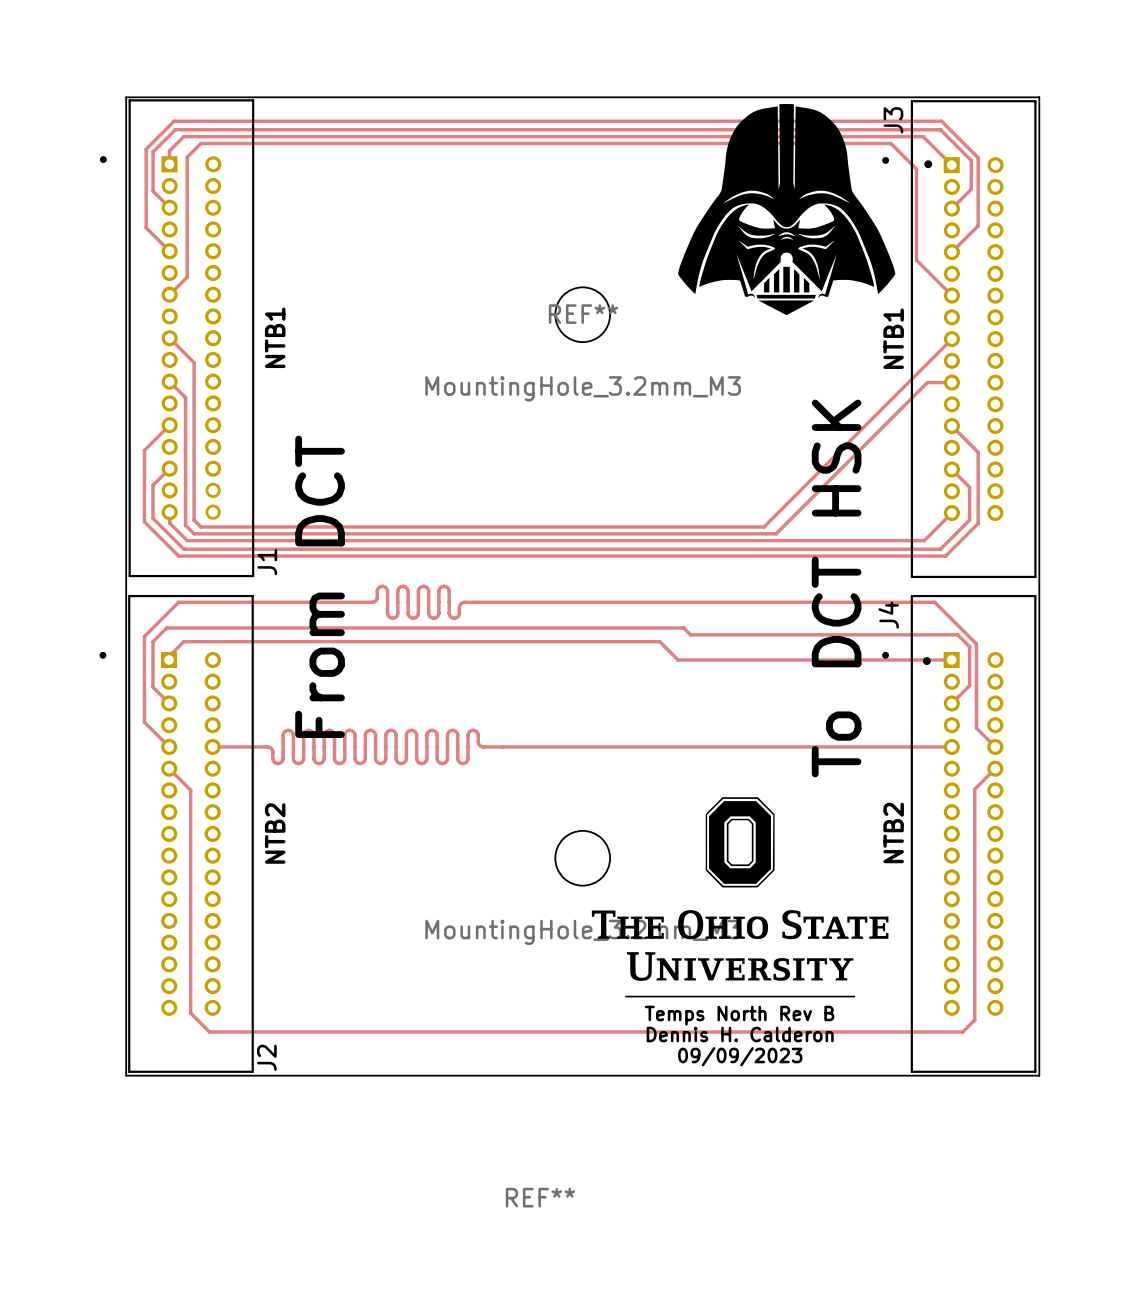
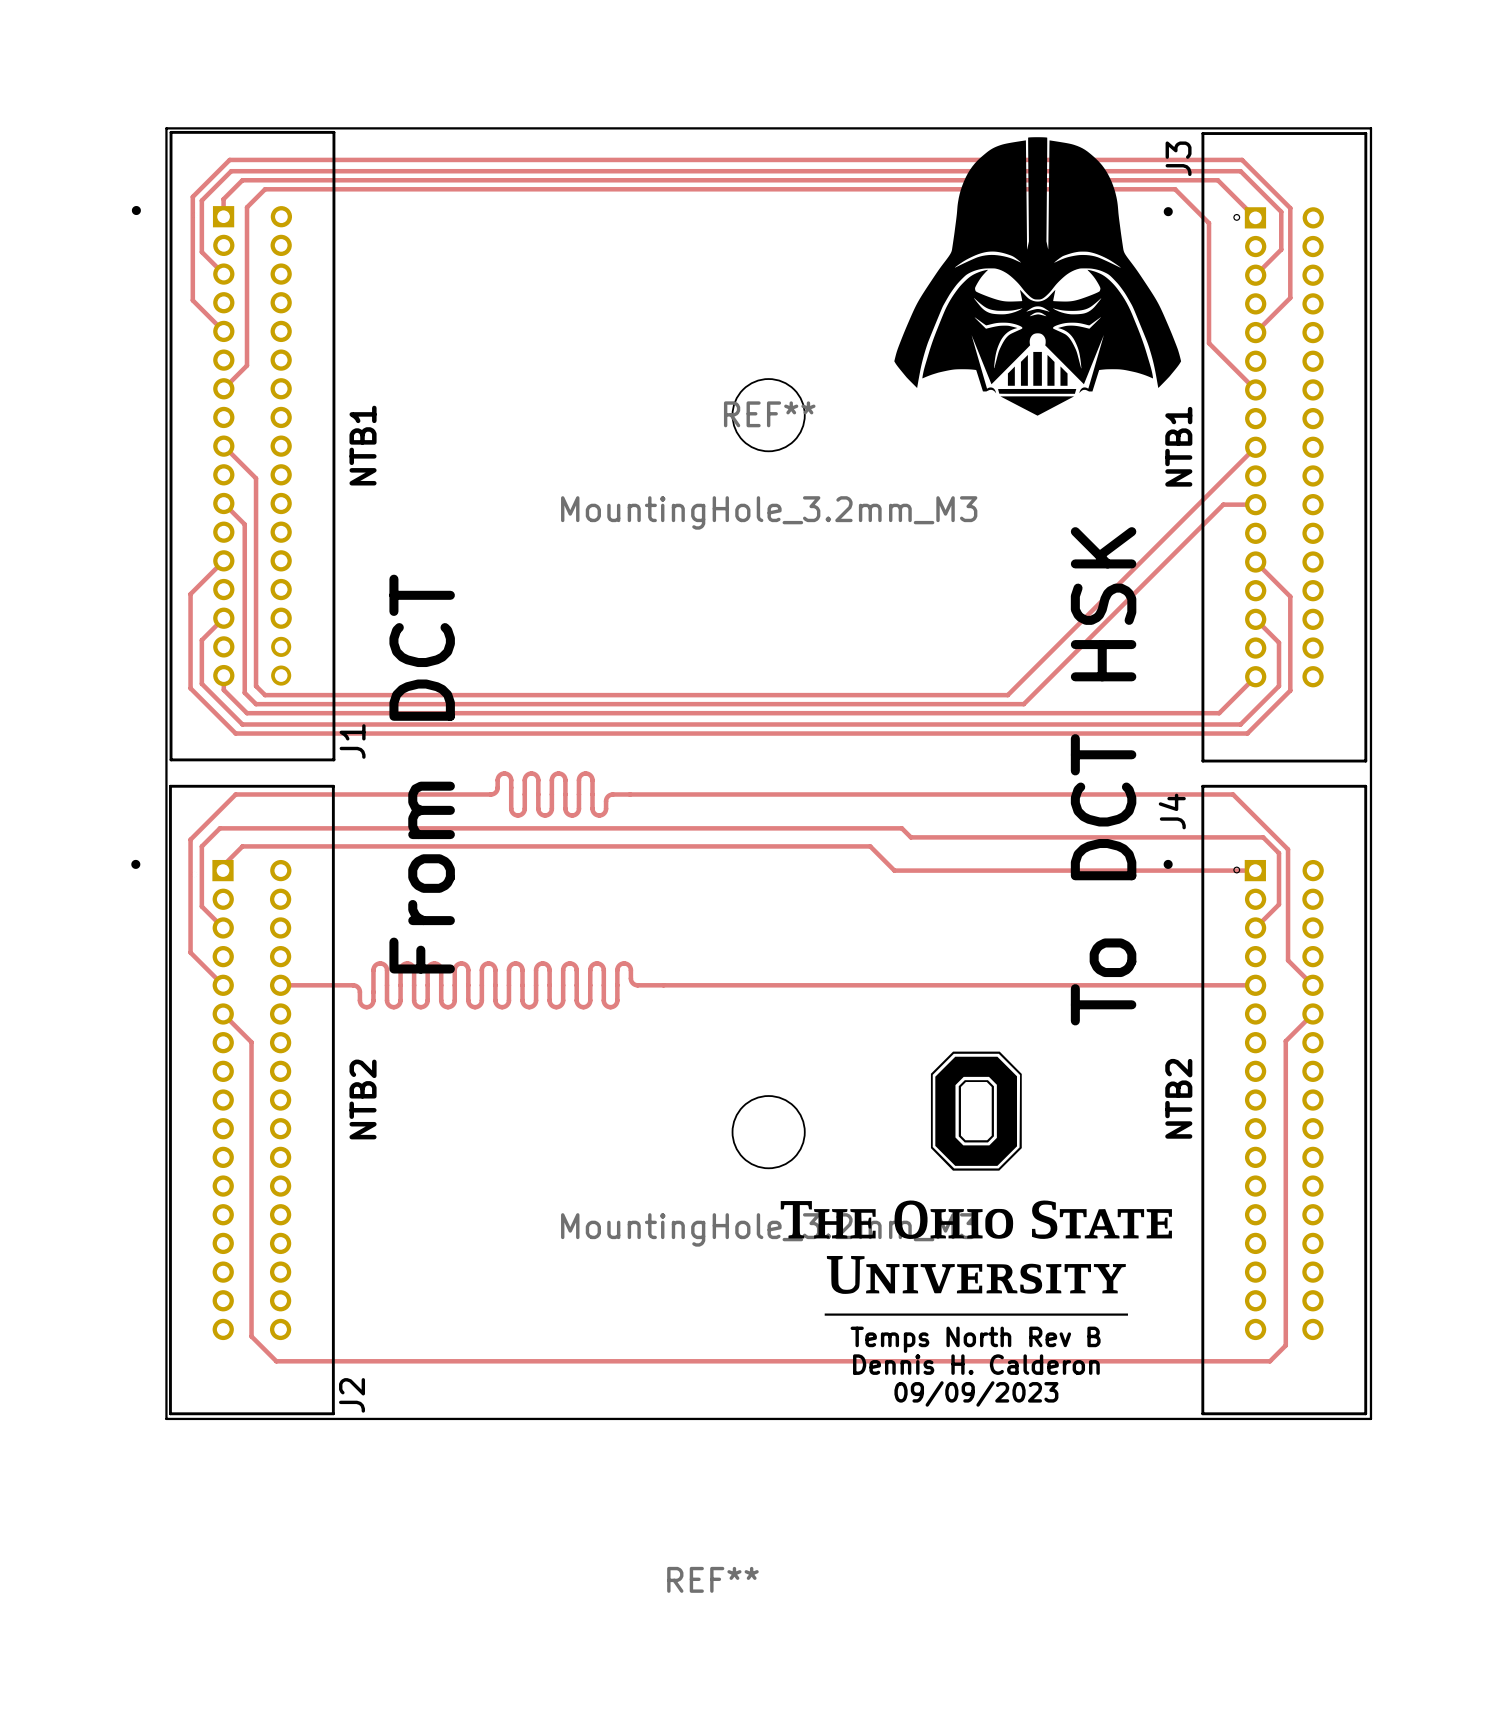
drawing: [924, 160, 933, 169] -> none
drawing: none -> [1233, 213, 1241, 221]
drawing: none -> [1233, 866, 1241, 874]
drawing: [922, 657, 931, 665] -> none

